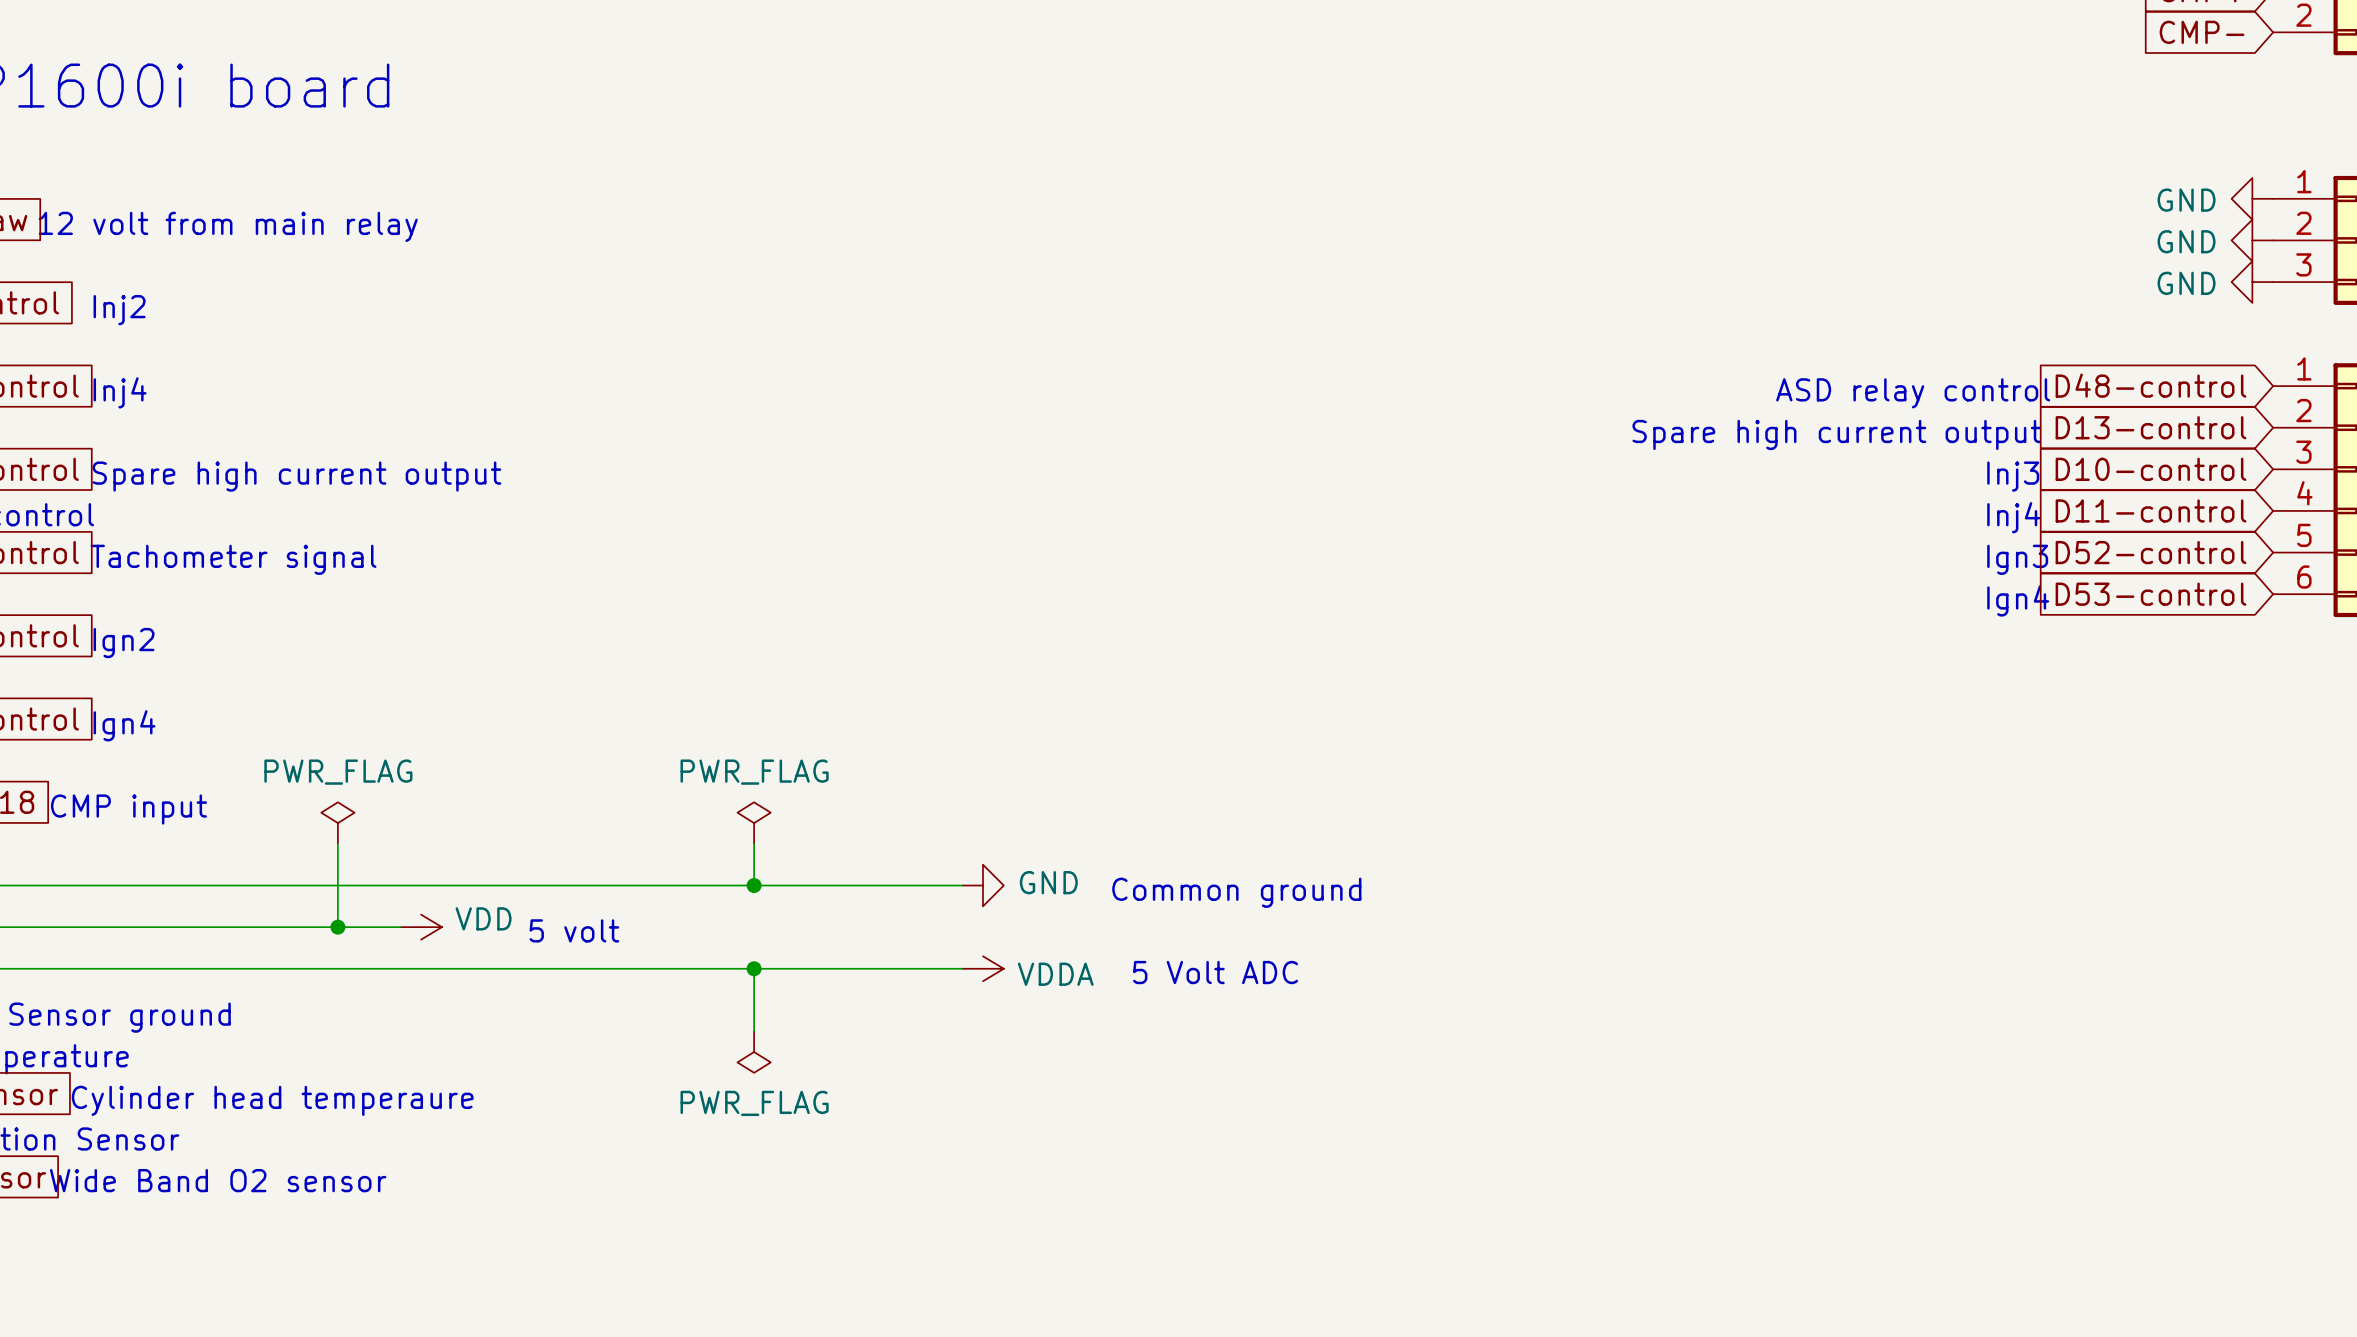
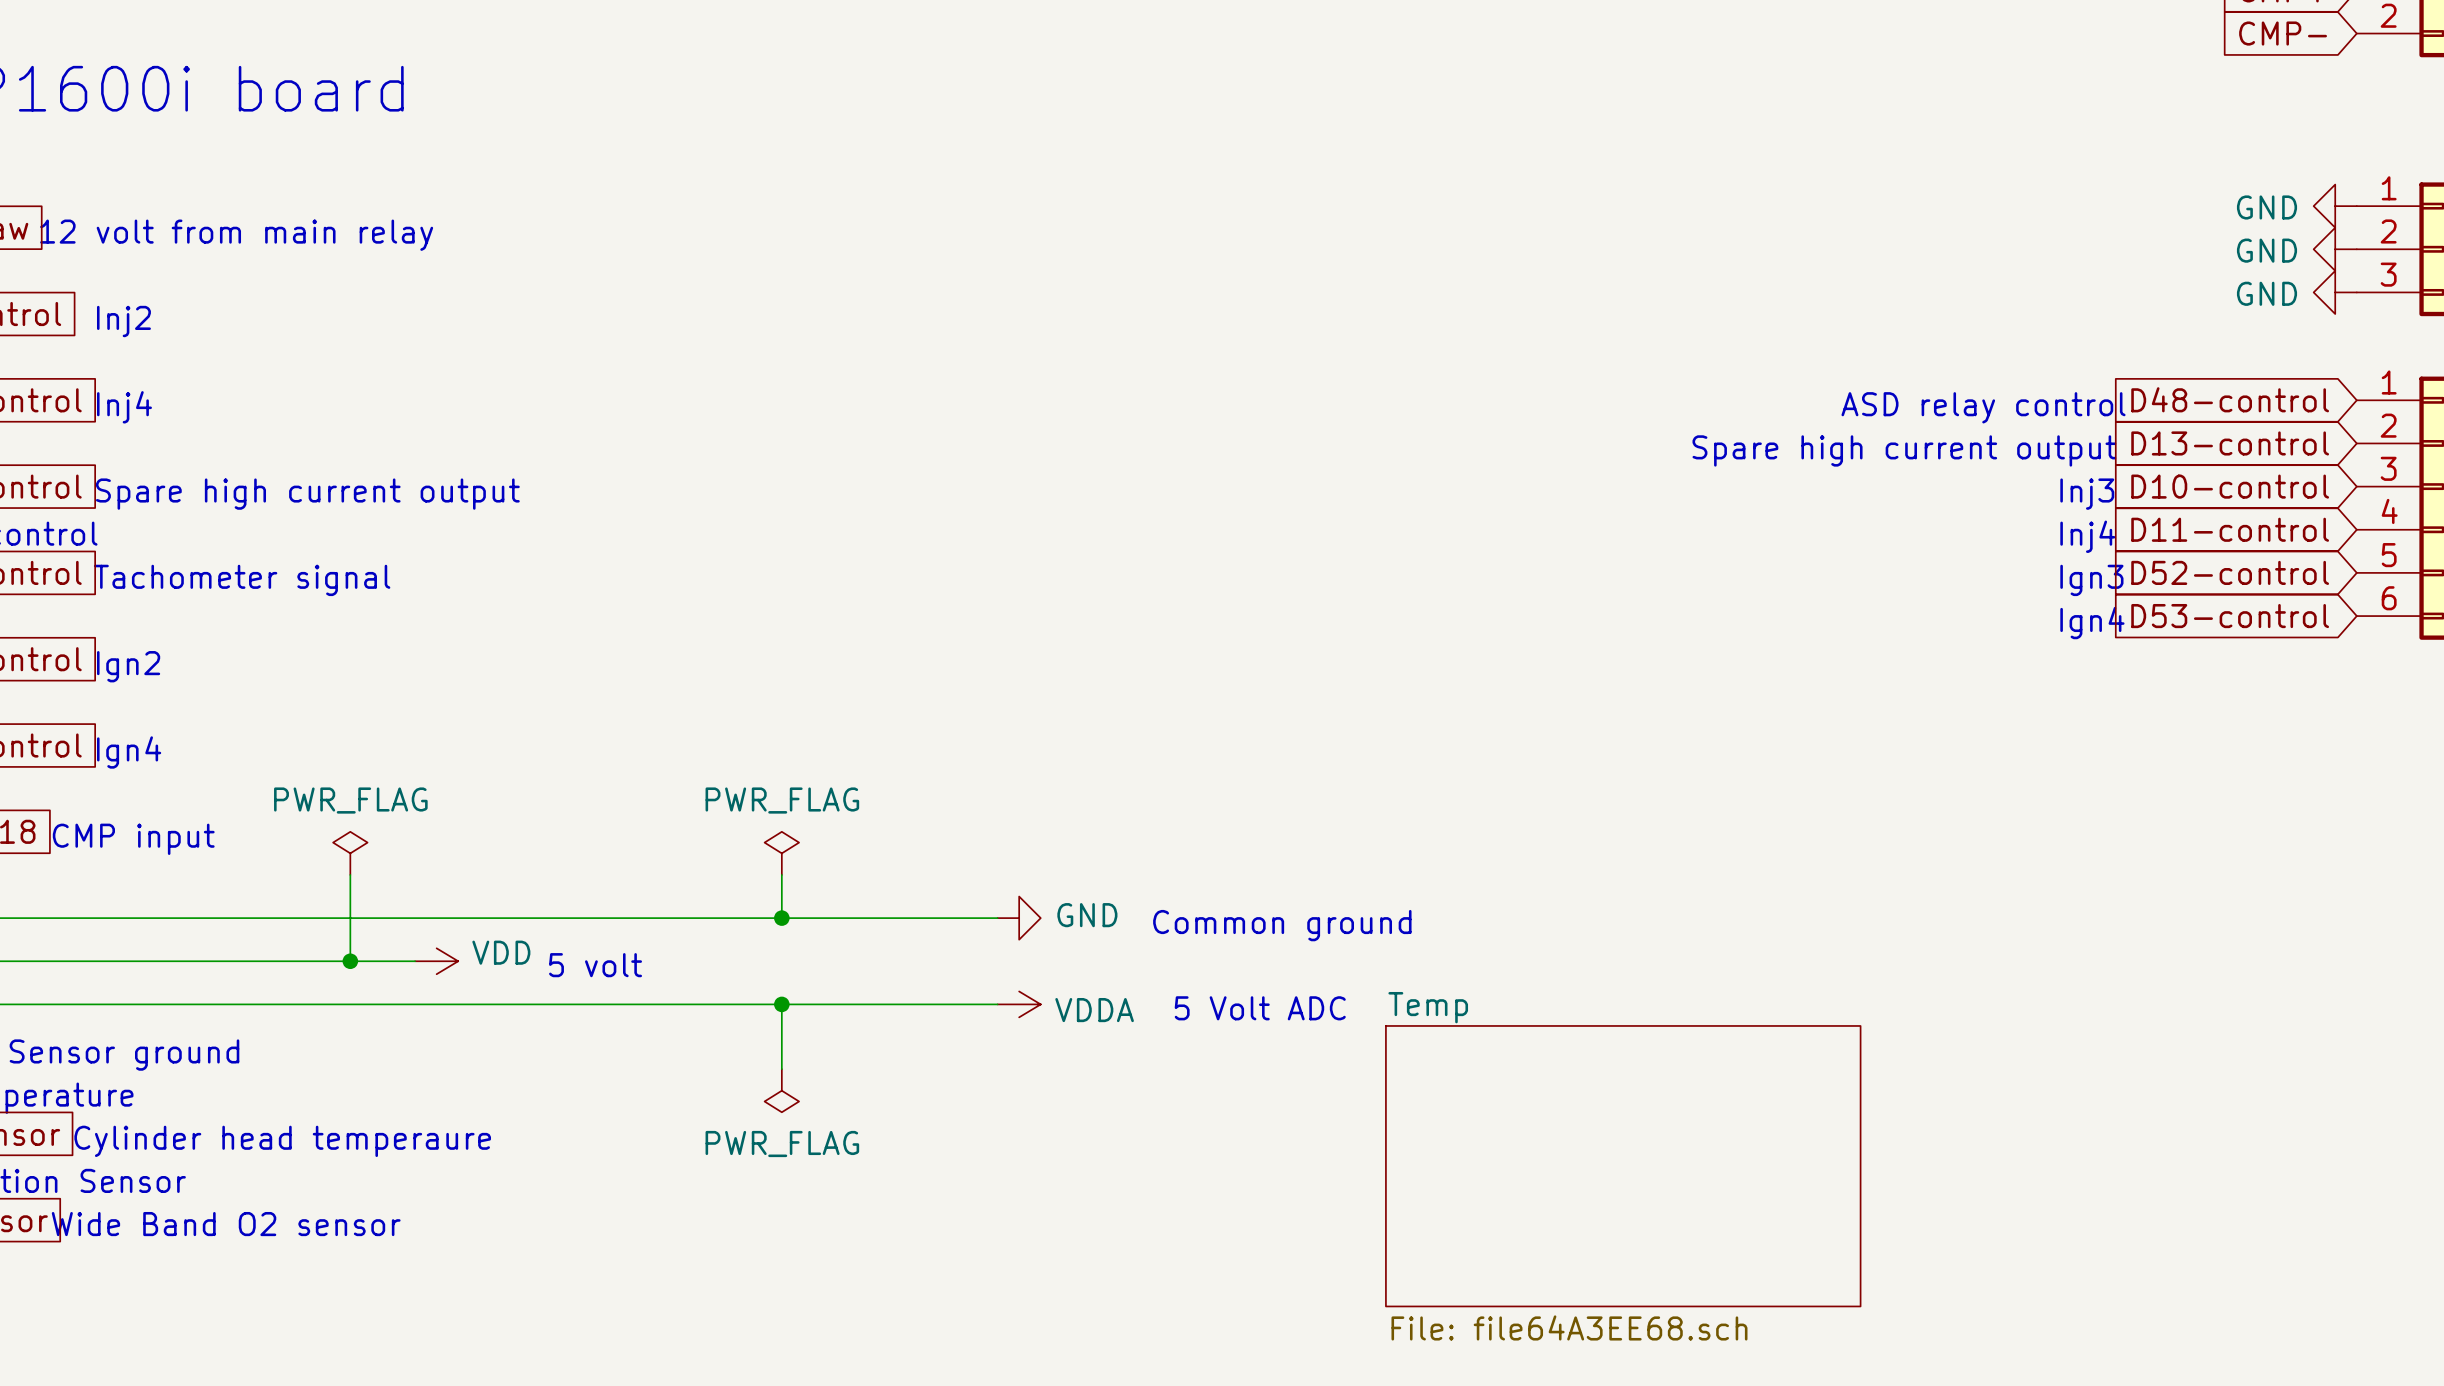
sheet Temp: none -> File: file64A3EE68.sch (1623, 1166)

